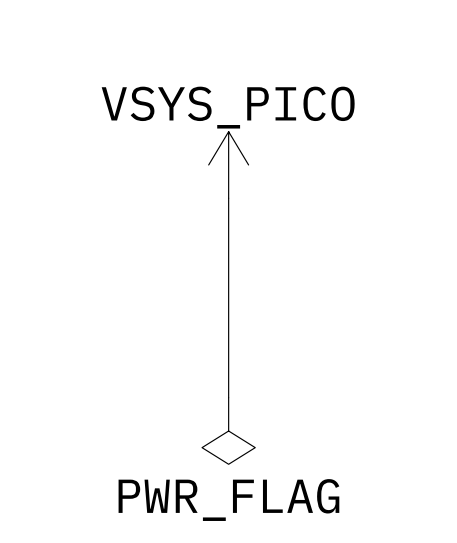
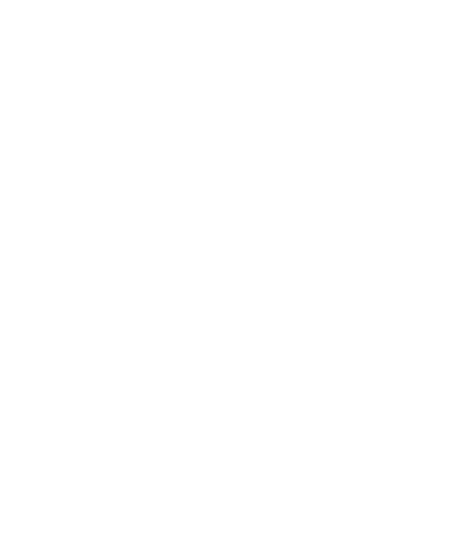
power symbol: VSYS_PICO (228, 164) -> none
wire: (228, 198) (228, 397) -> none
power symbol: PWR_FLAG (228, 431) -> none

